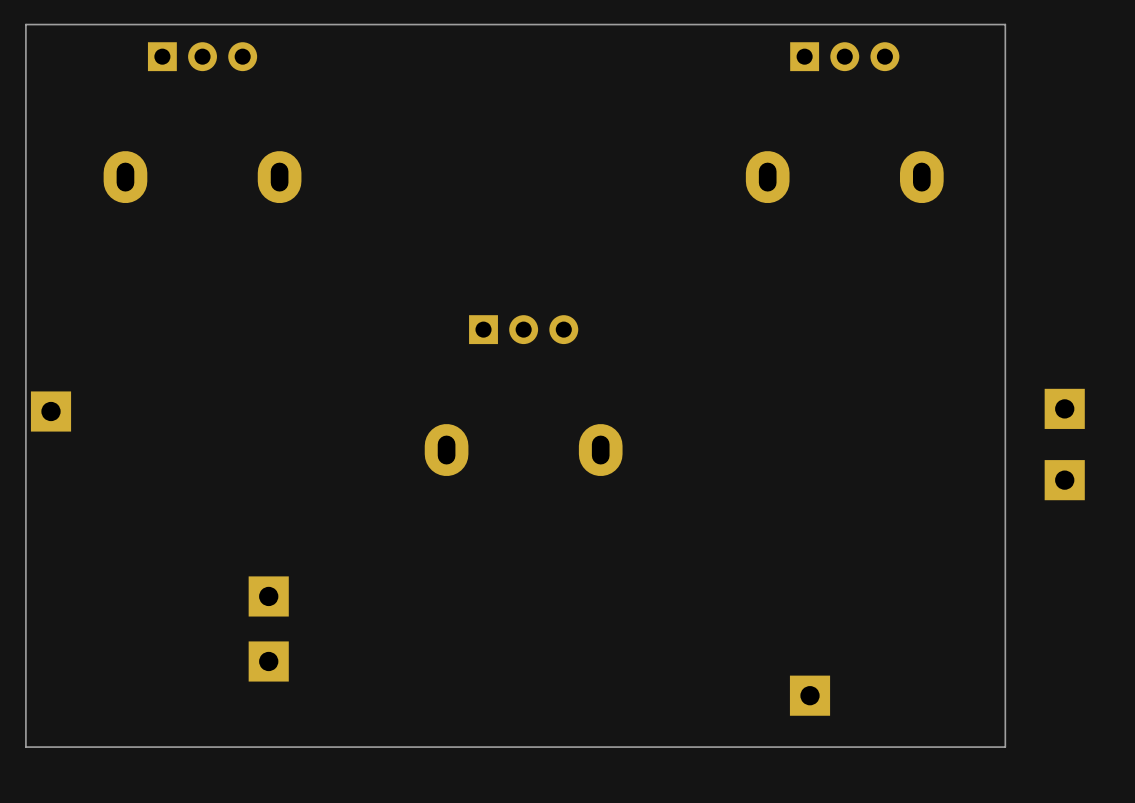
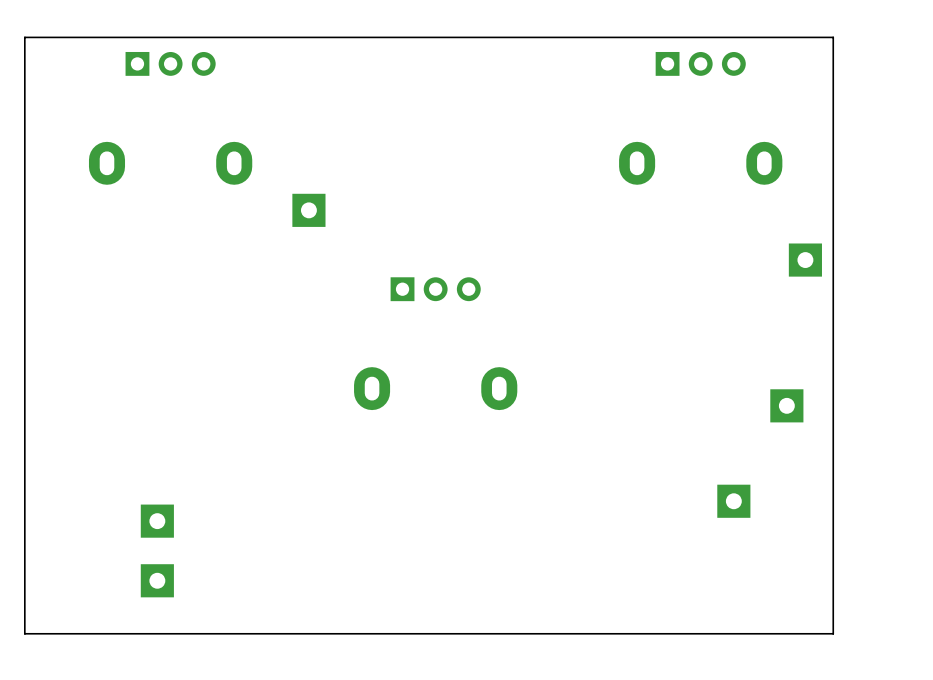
part: none -> (308, 210)
part: none -> (805, 260)
part: (1064, 408) -> none
part: (51, 411) -> none
part: none -> (786, 405)
part: (1064, 480) -> none
part: none -> (733, 501)
part: (268, 596) -> none
part: none -> (157, 521)
part: (268, 661) -> none
part: none -> (157, 580)
part: (810, 695) -> none

